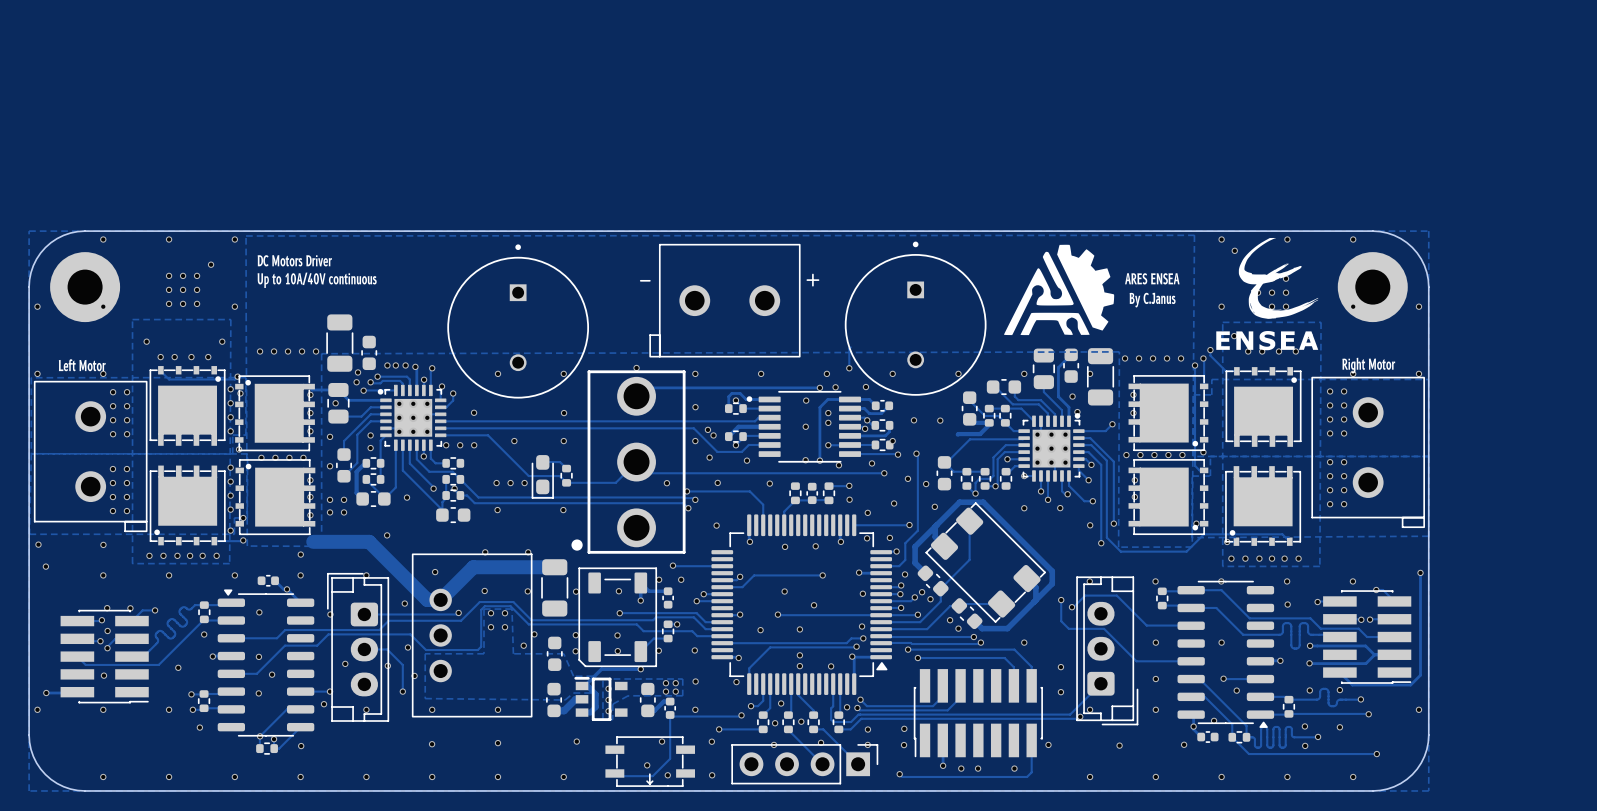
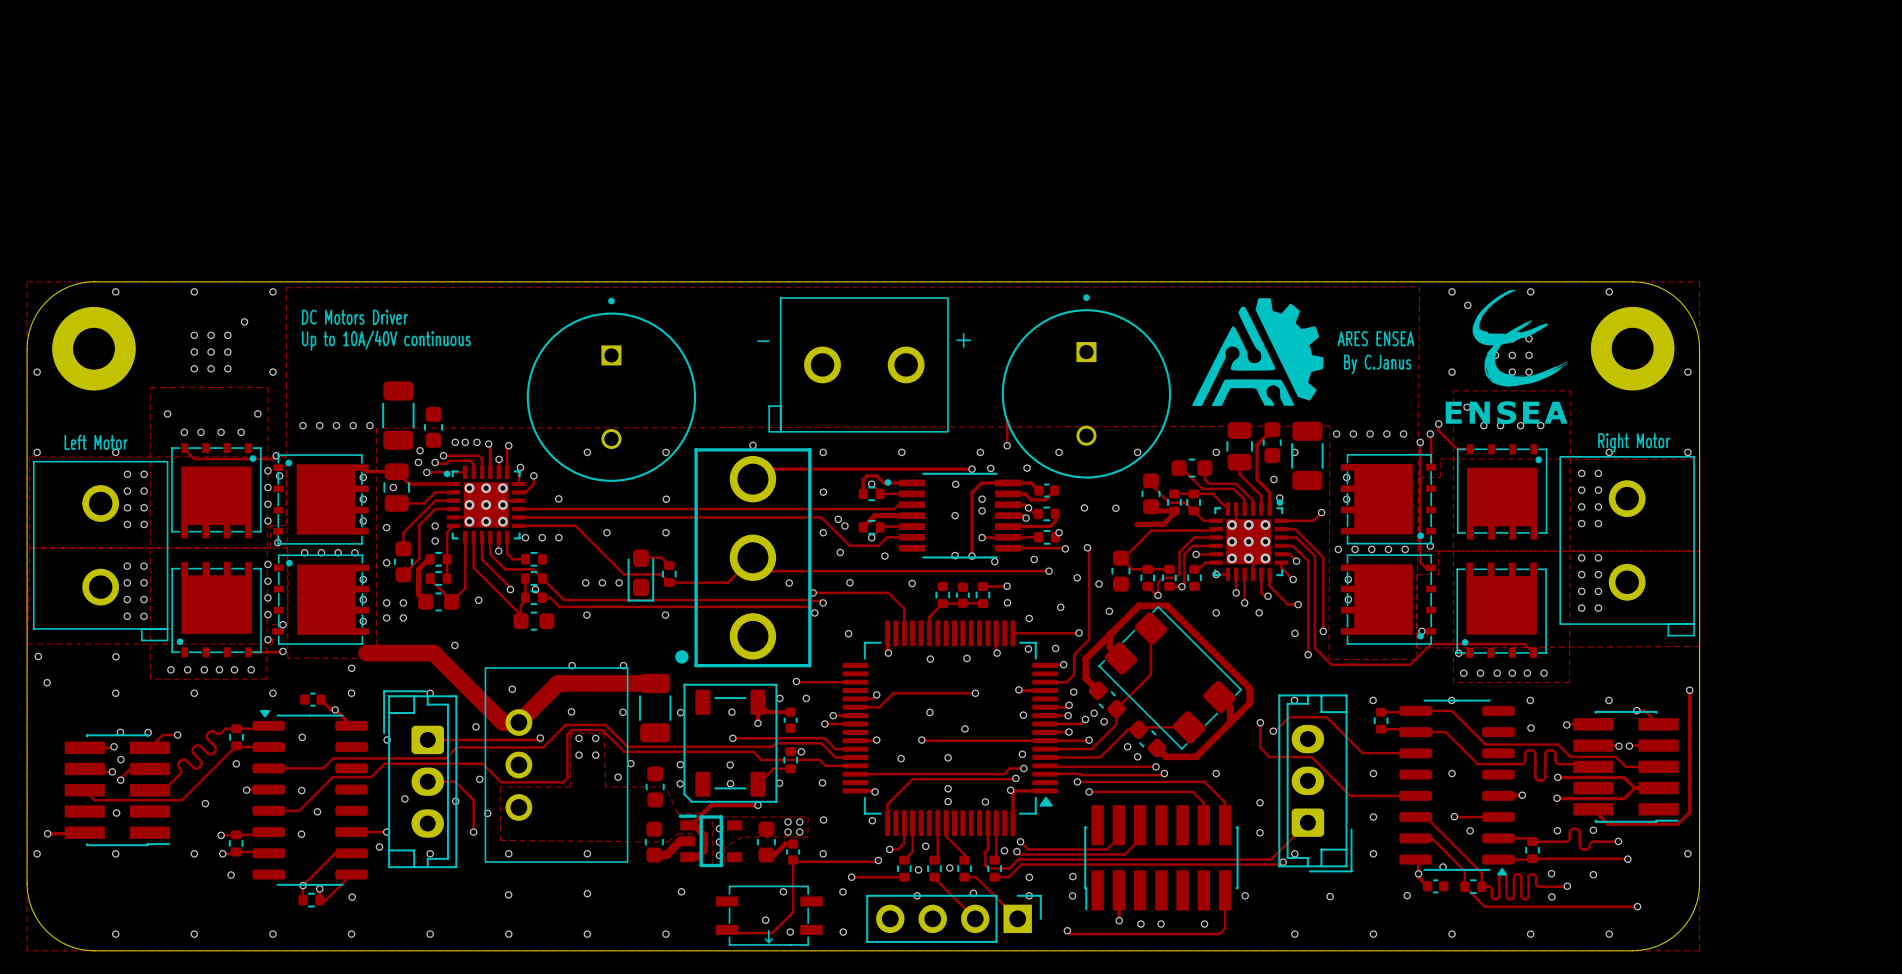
via: (103, 306) -> none
via: (1353, 306) -> none

